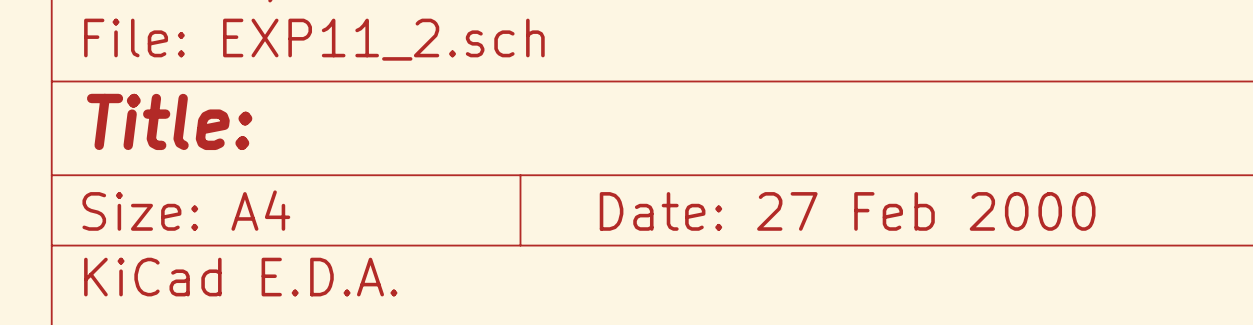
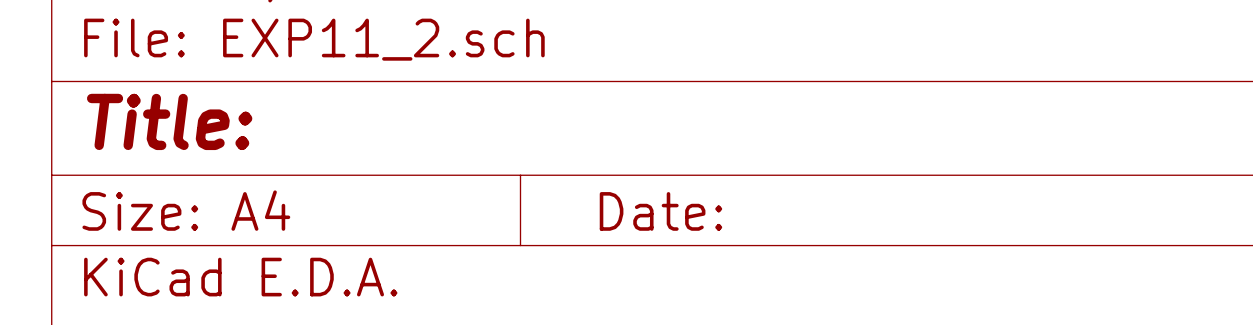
title block: Date: 27 Feb 2000 (847, 211) -> Date: (660, 211)

